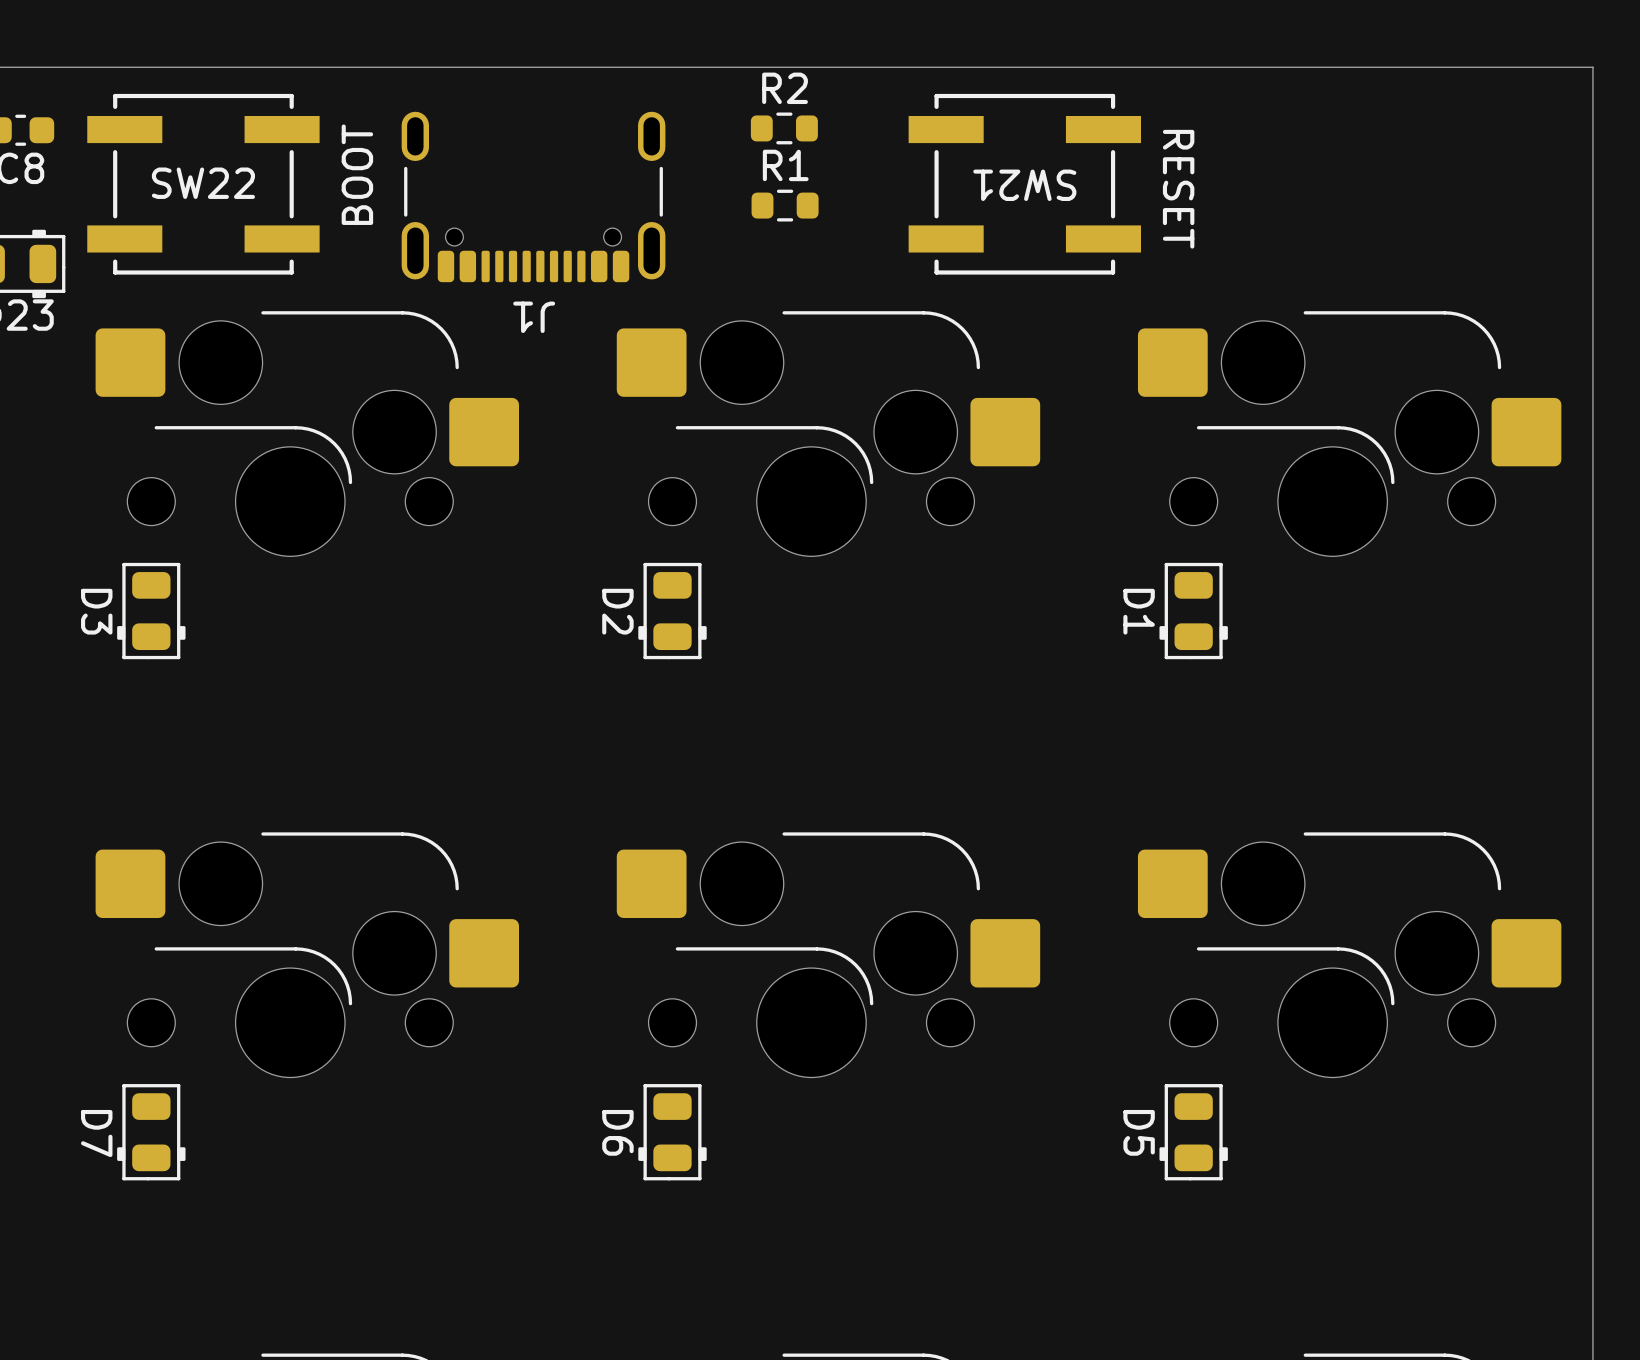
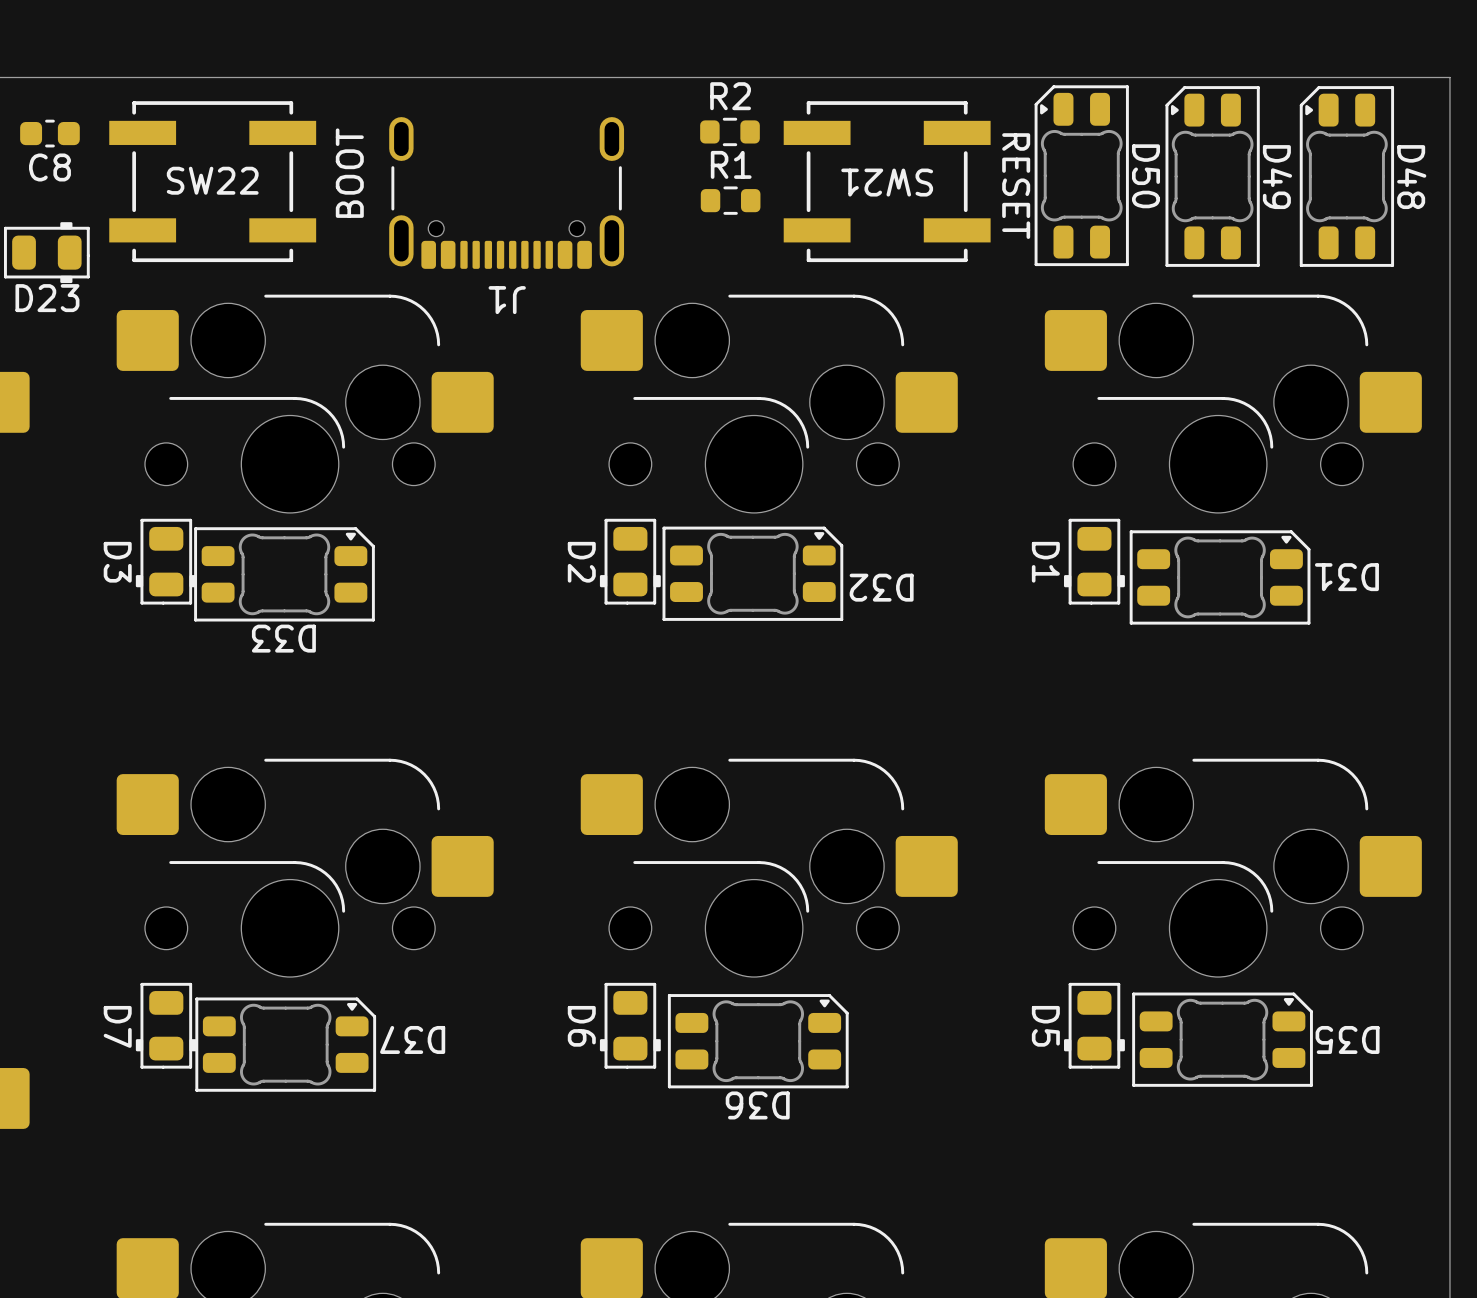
D50: none -> (1081, 175)
D49: none -> (1212, 176)
D48: none -> (1346, 176)
SW21 position: (1024, 184) -> (887, 181)
SW21 text position: RESET (1178, 189) -> RESET (1016, 186)
D32: none -> (752, 573)
D33: none -> (284, 574)
D31: none -> (1220, 577)
D35: none -> (1222, 1039)
D36: none -> (758, 1041)
D37: none -> (285, 1044)

